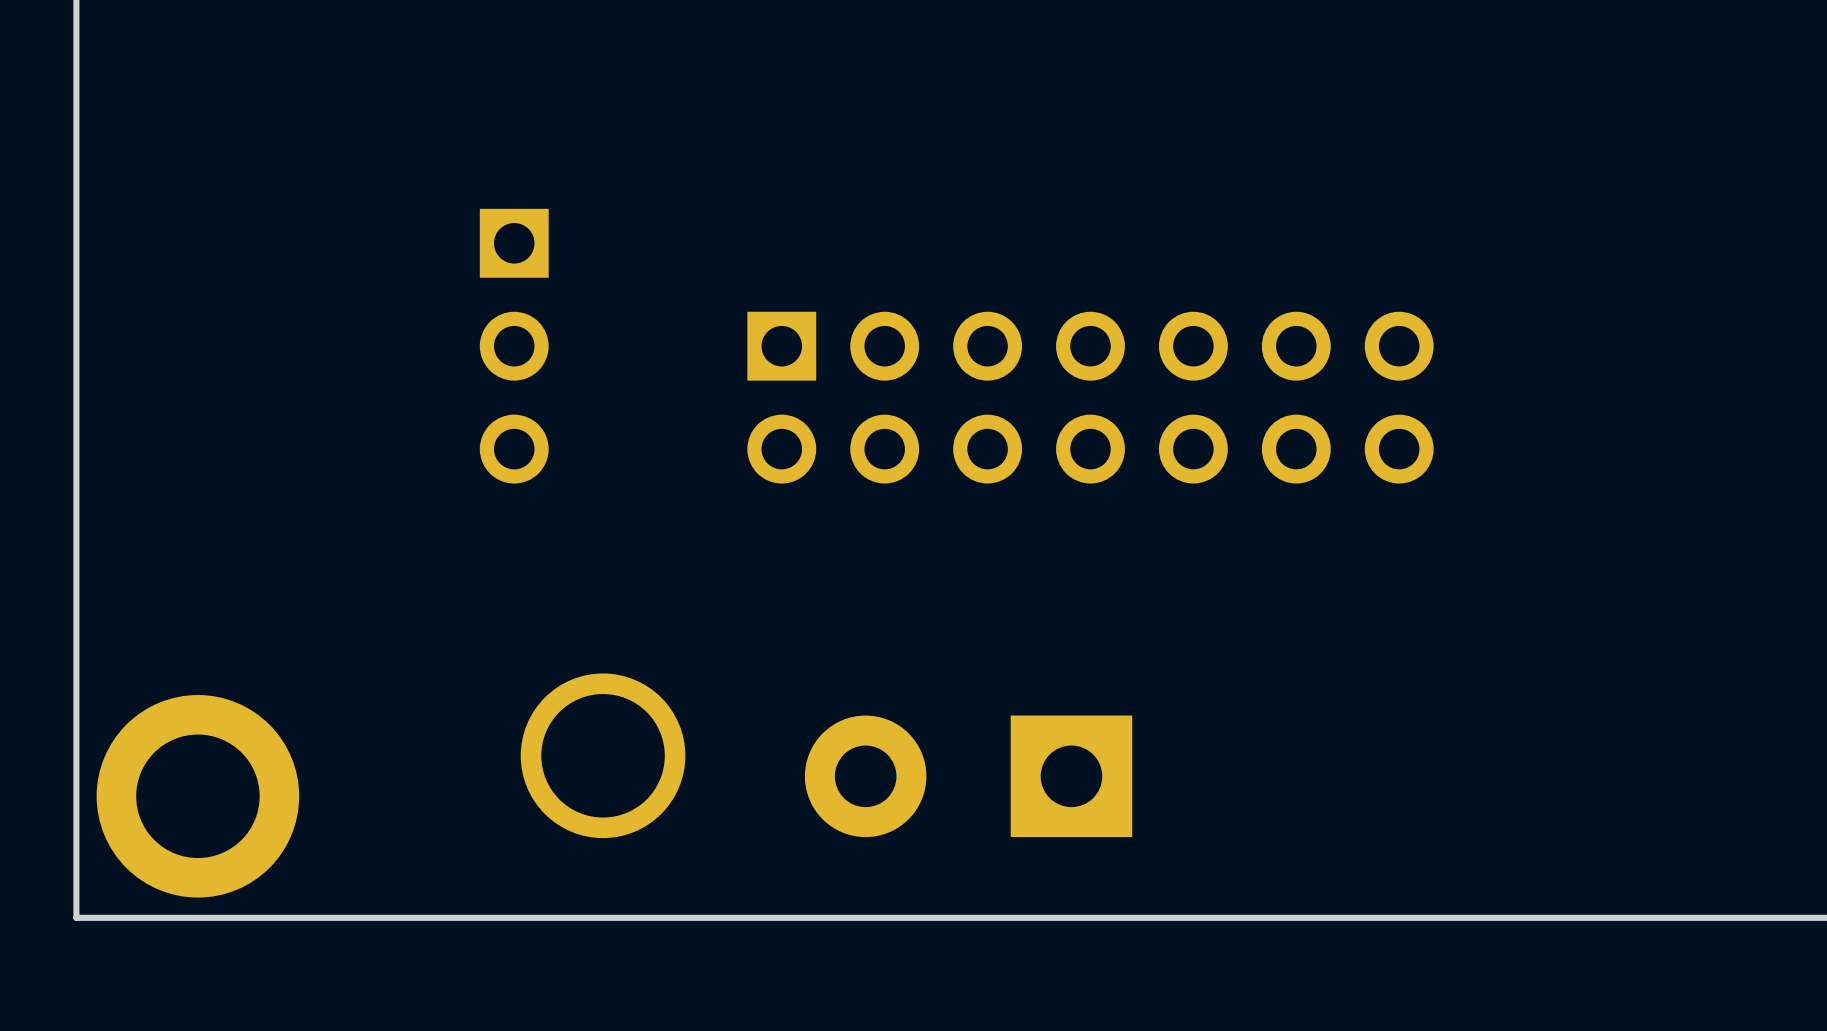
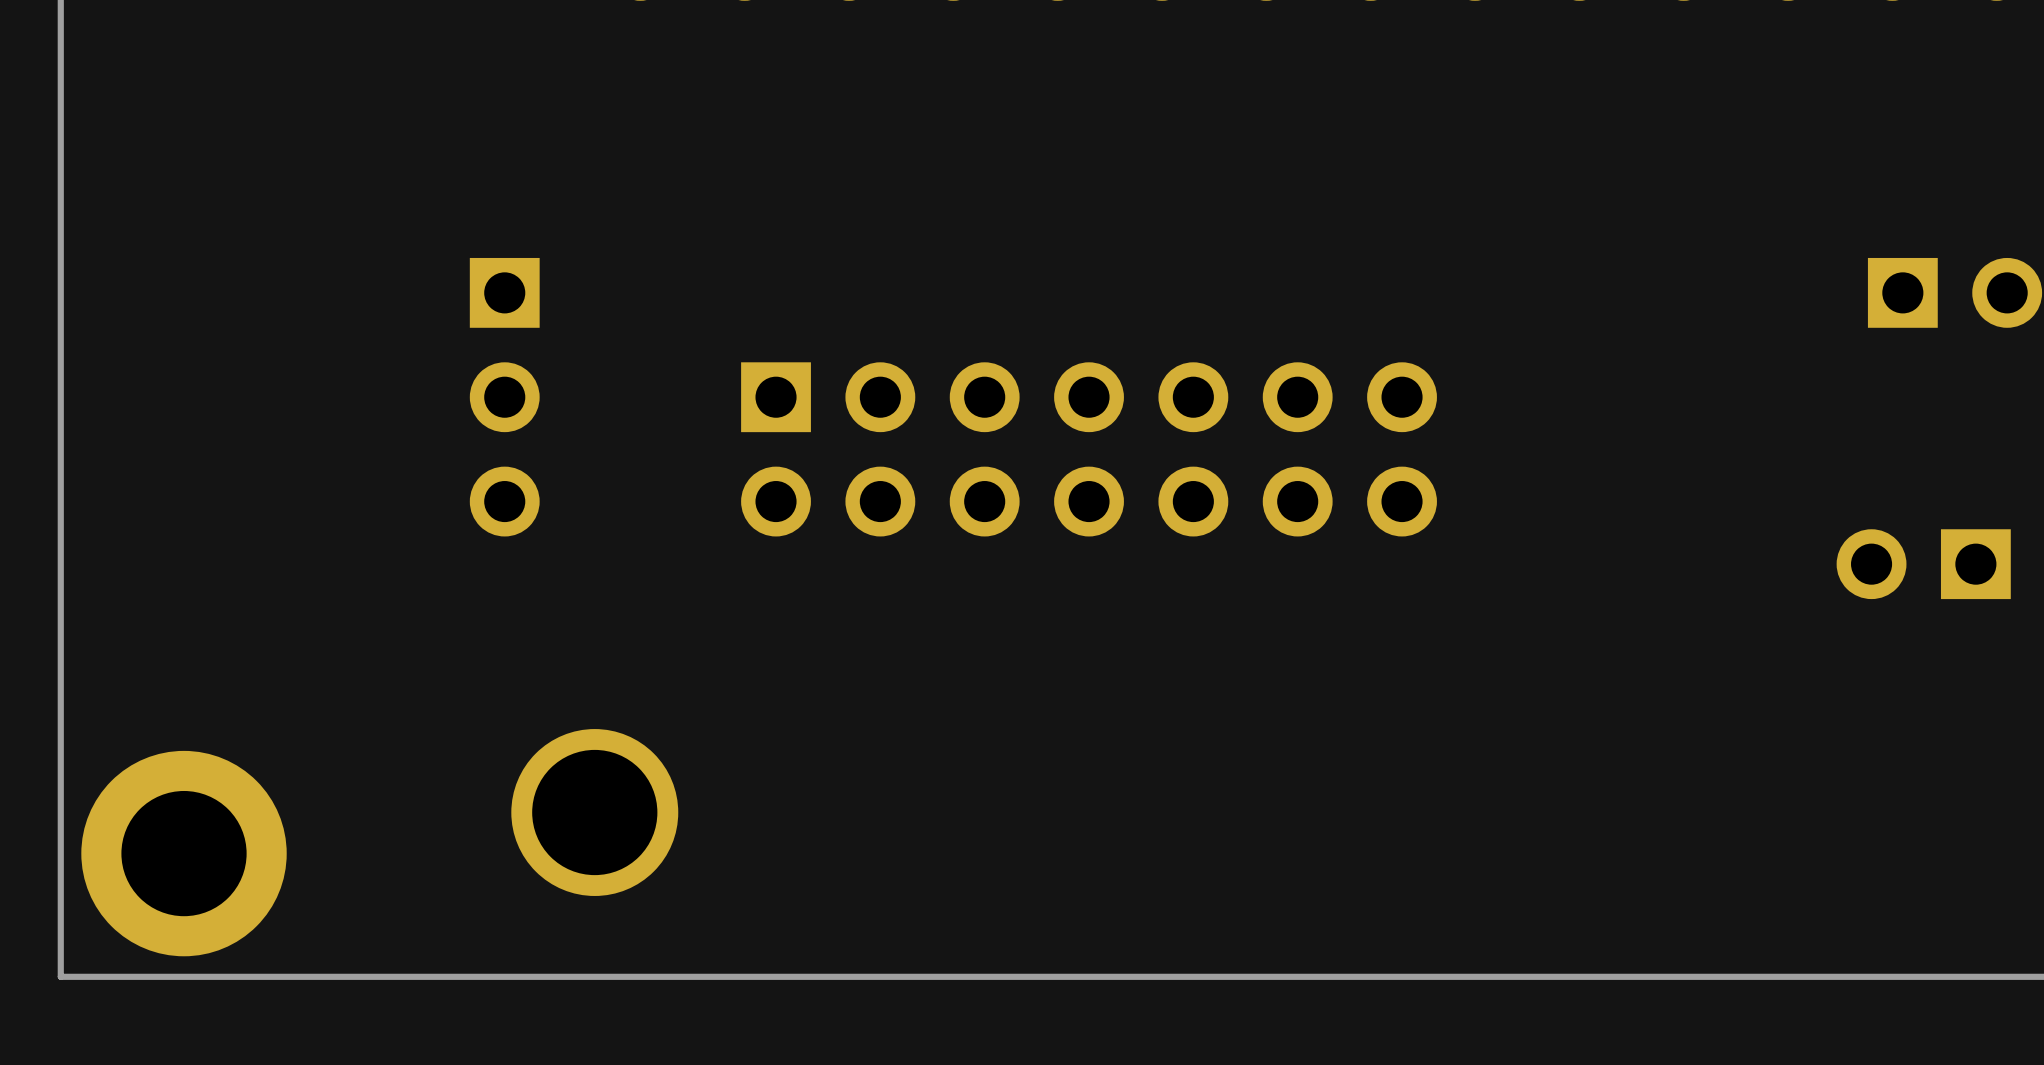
part: (968, 776) -> none

